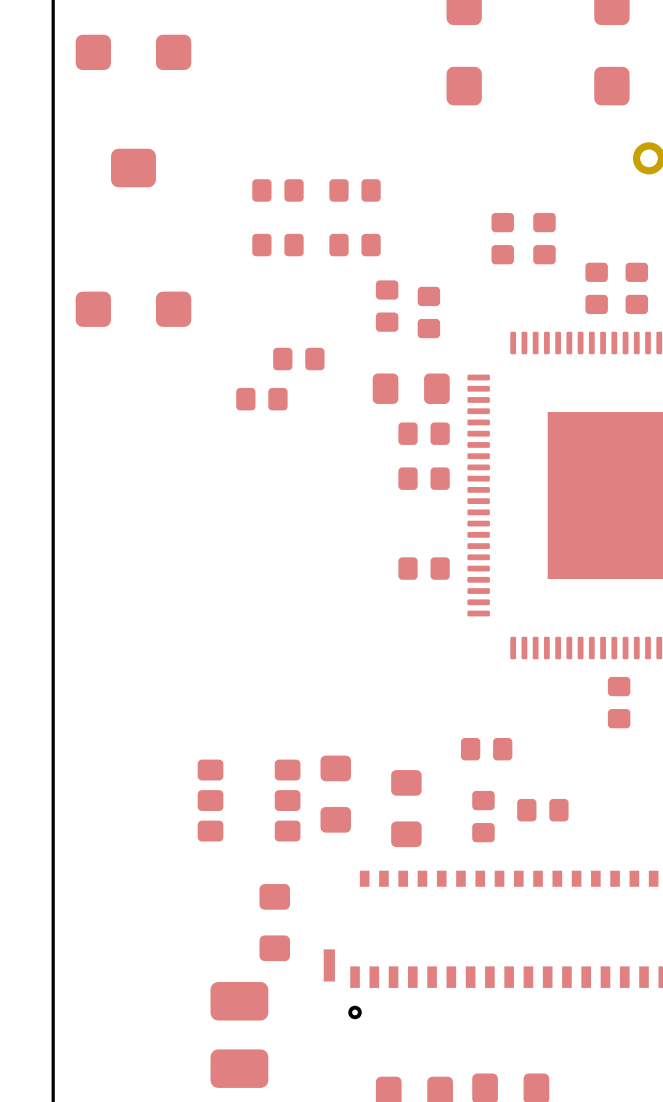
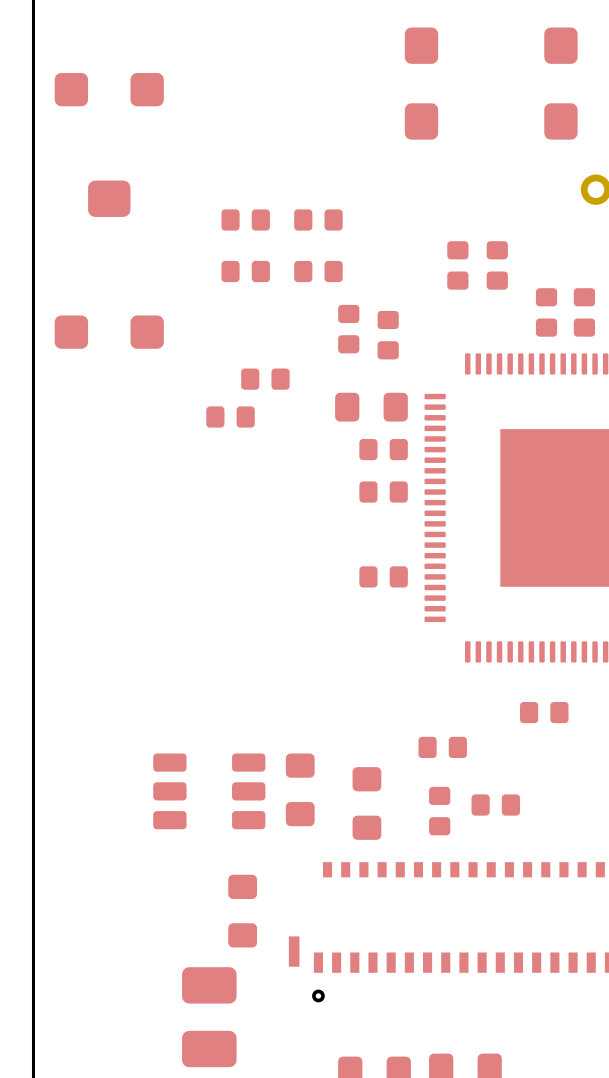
part rotation: 0° (619, 702) -> 90° clockwise (544, 712)
part footprint: [197, 759, 301, 842] -> [153, 753, 266, 830]

